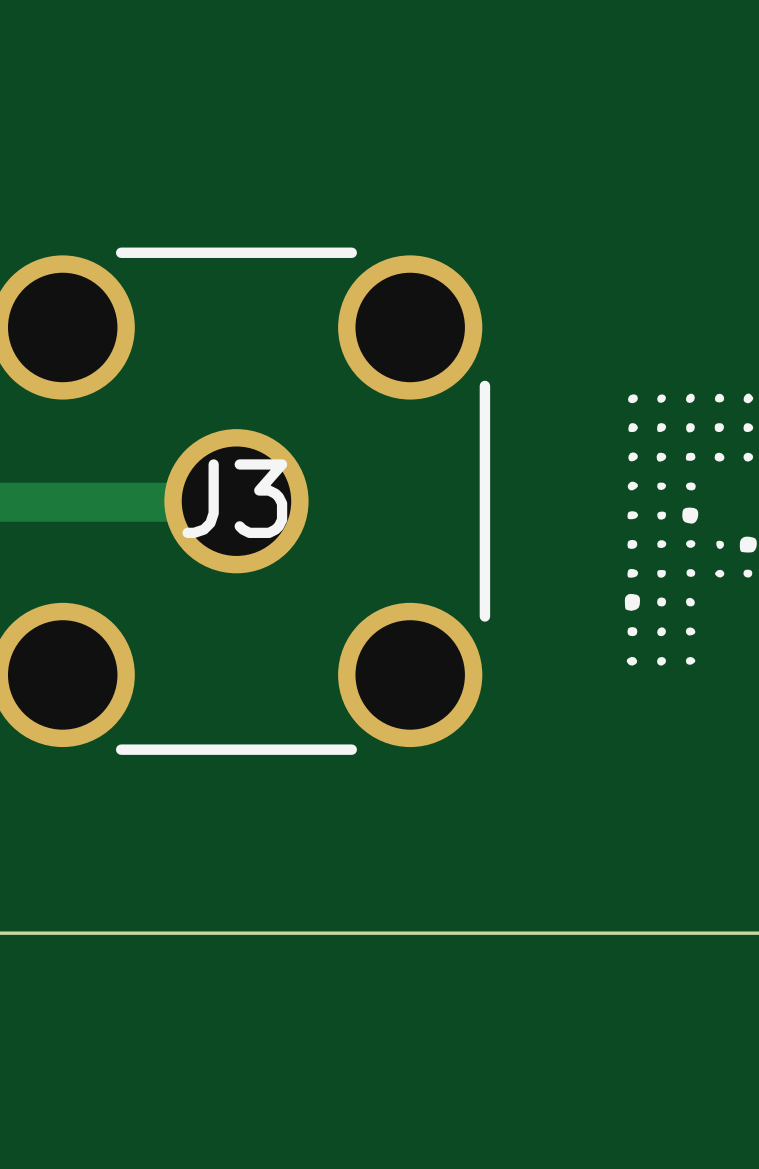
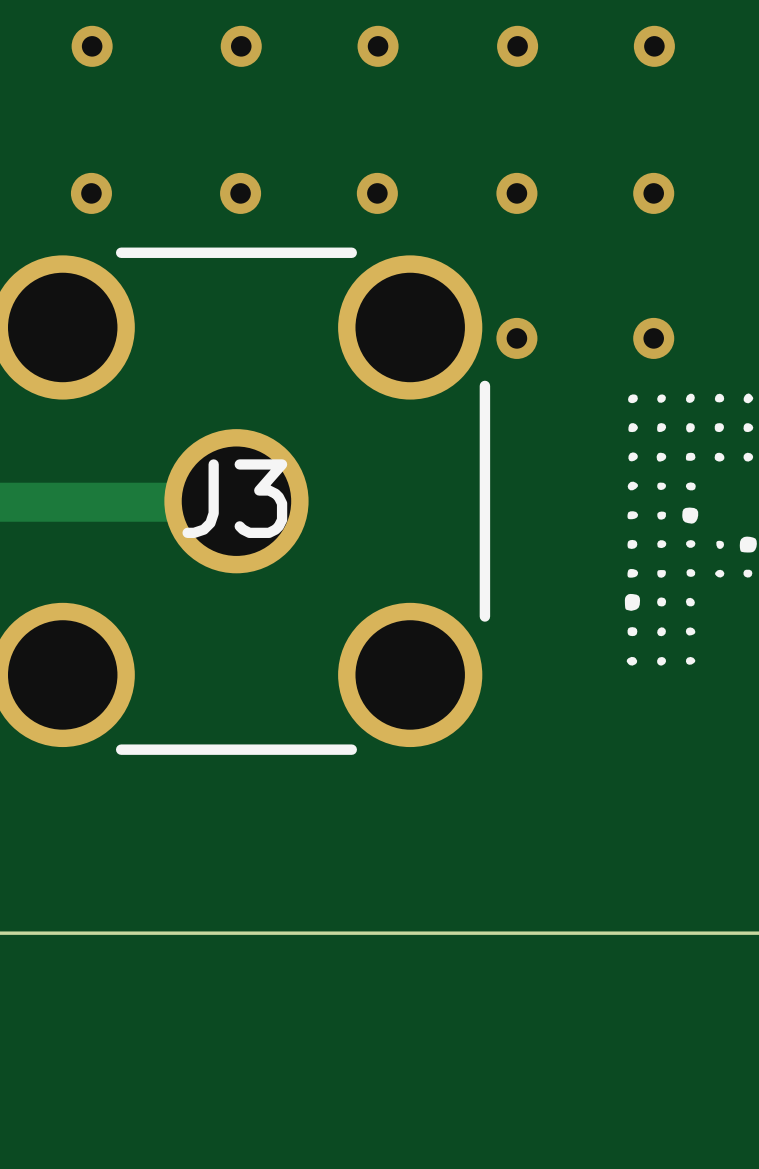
via: none -> (92, 46)
via: none -> (241, 46)
via: none -> (378, 46)
via: none -> (517, 46)
via: none -> (654, 46)
via: none -> (91, 193)
via: none -> (240, 193)
via: none -> (377, 193)
via: none -> (516, 193)
via: none -> (653, 193)
via: none -> (516, 338)
via: none -> (653, 338)

